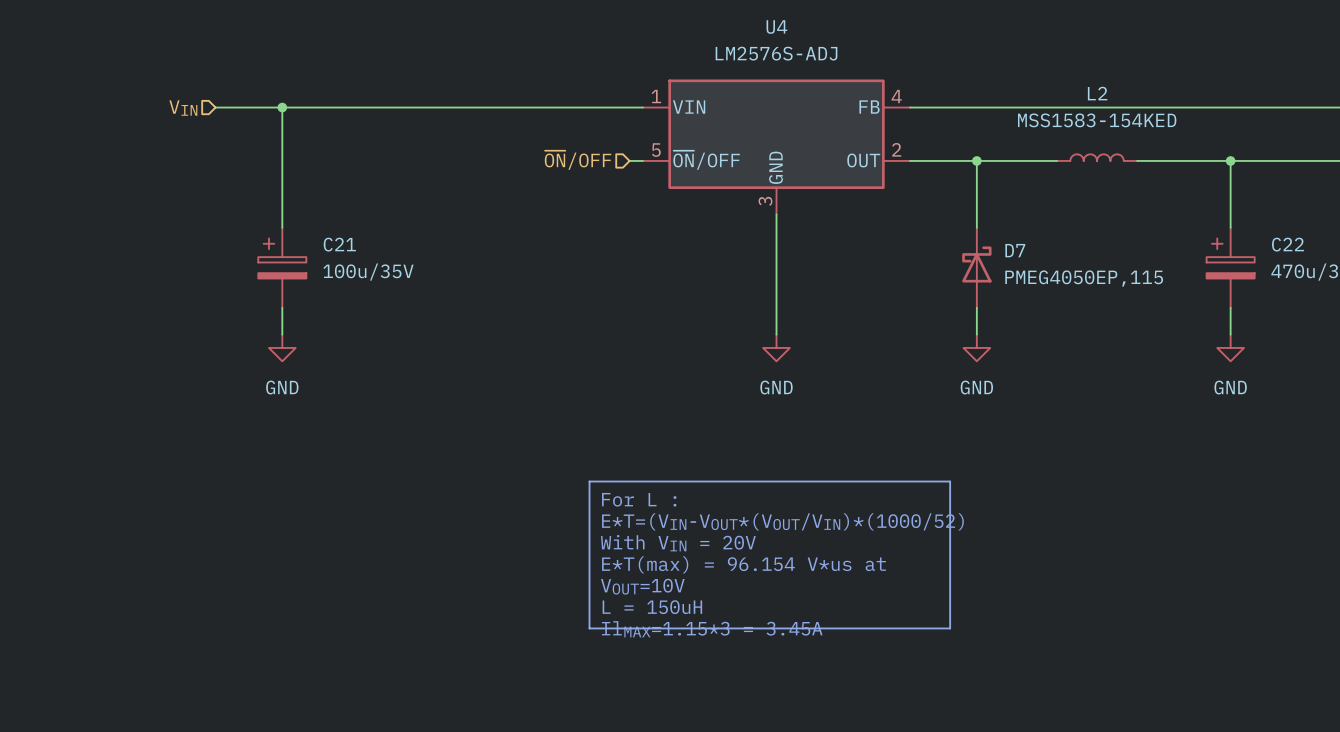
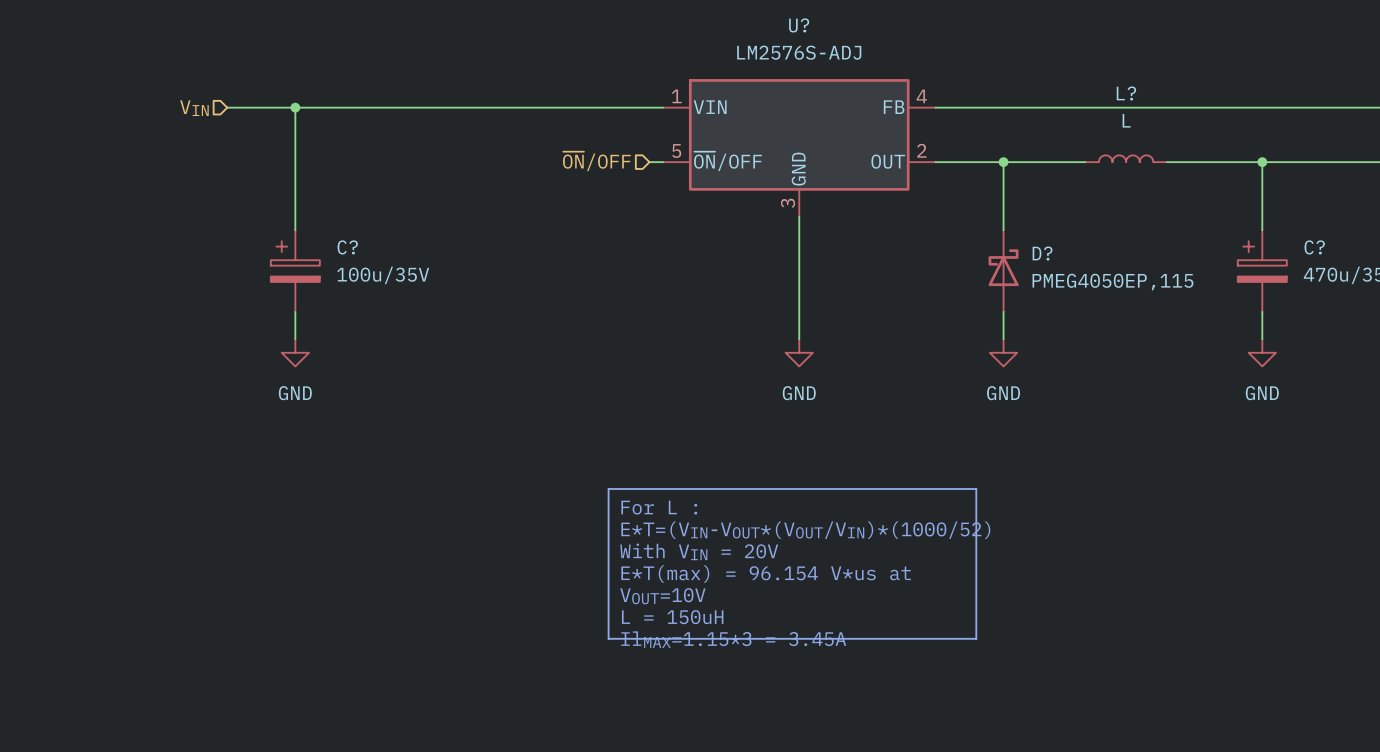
U4 name: U4 (776, 27) -> U? (799, 25)
L2 name: L2 (1097, 93) -> L? (1126, 93)
L2 value: MSS1583-154KED (1097, 120) -> L (1126, 120)
C21 name: C21 (339, 244) -> C? (347, 247)
C22 name: C22 (1287, 244) -> C? (1314, 247)
D7 name: D7 (1015, 250) -> D? (1042, 253)

